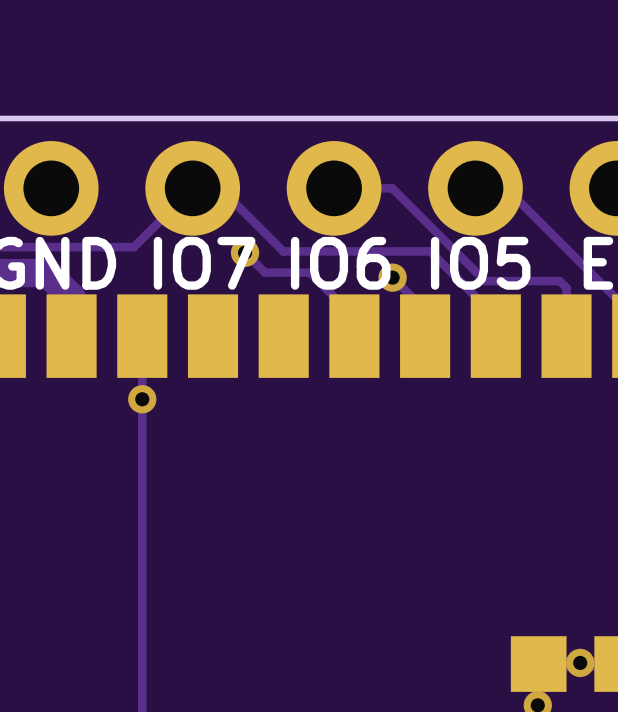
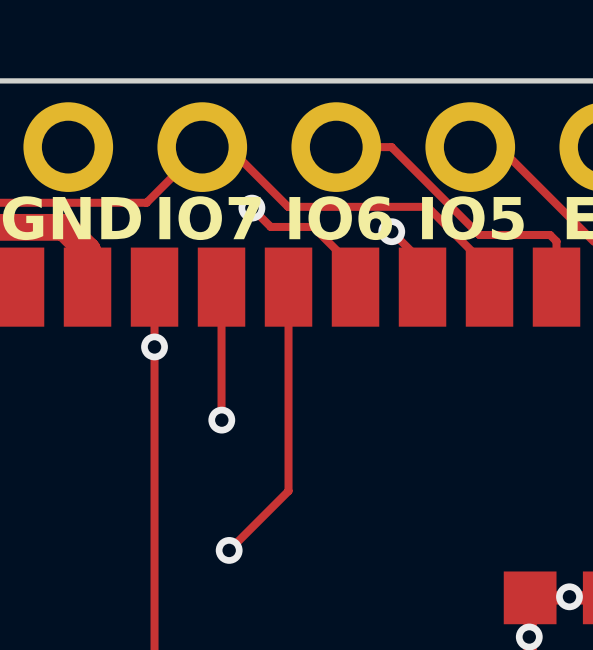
track: none -> (221, 287) (221, 419)
track: none -> (288, 287) (288, 491) (229, 550)
via: none -> (221, 420)
via: none -> (229, 550)

